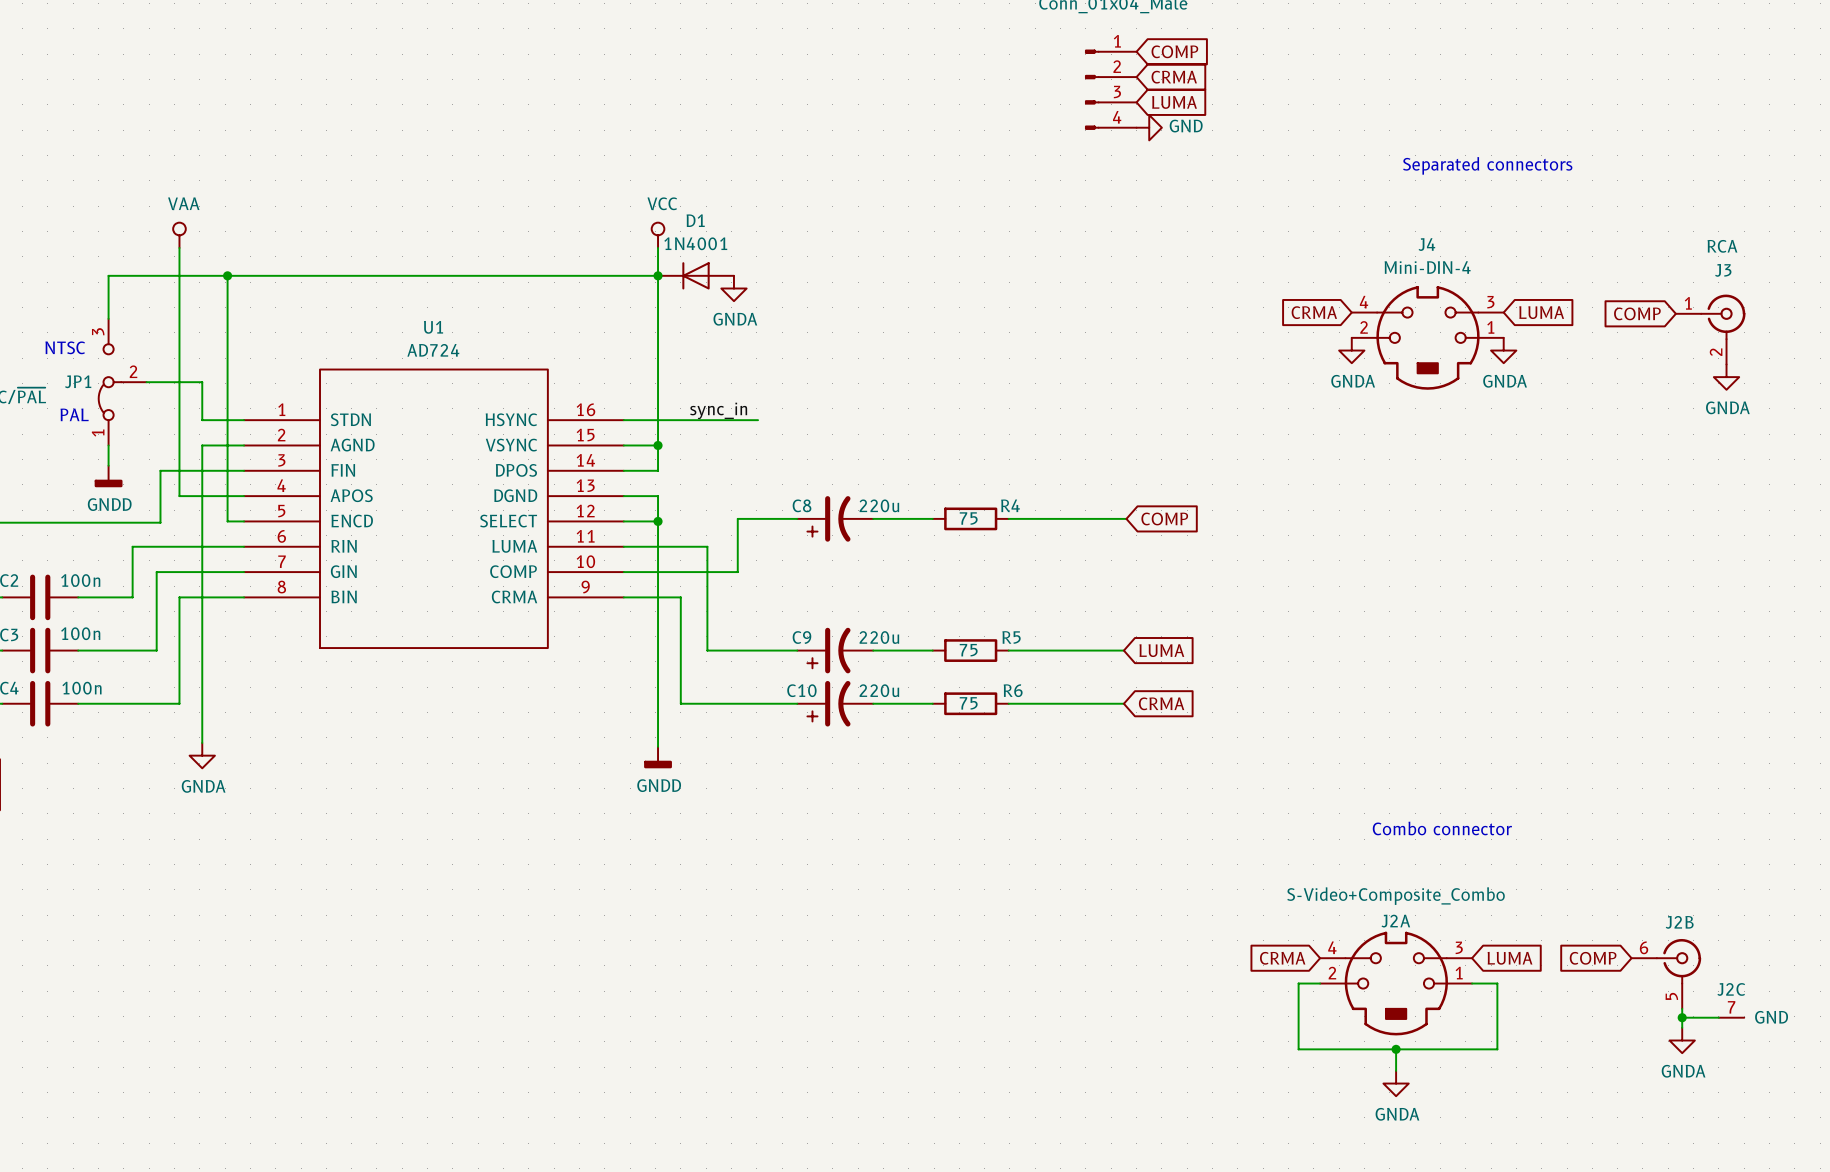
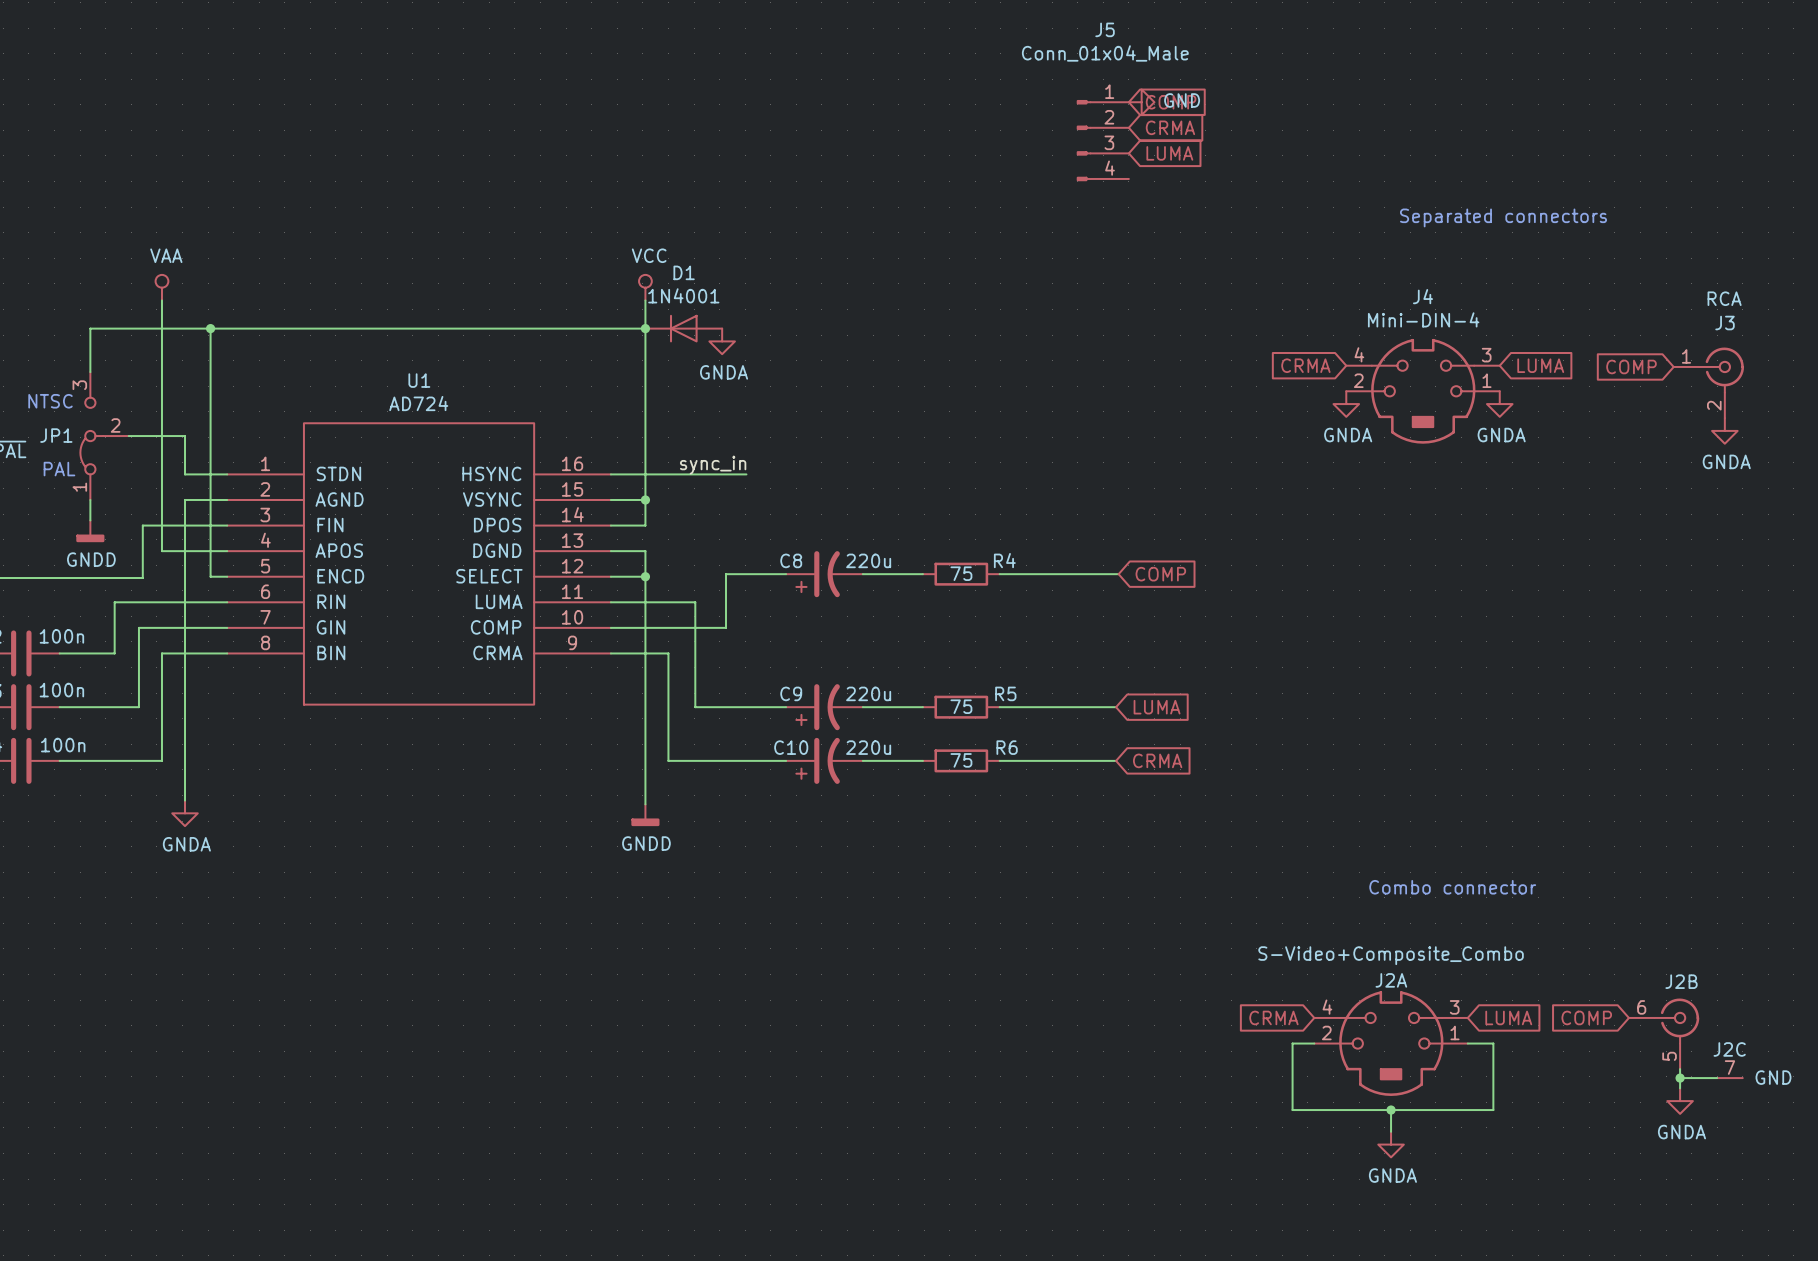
power symbol position: GND (1149, 127) -> GND (1141, 102)

